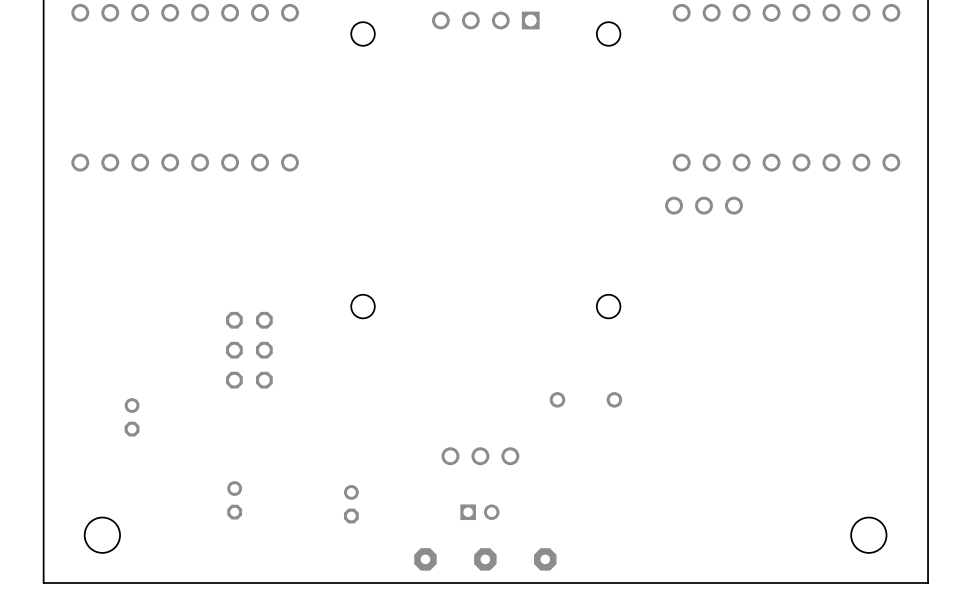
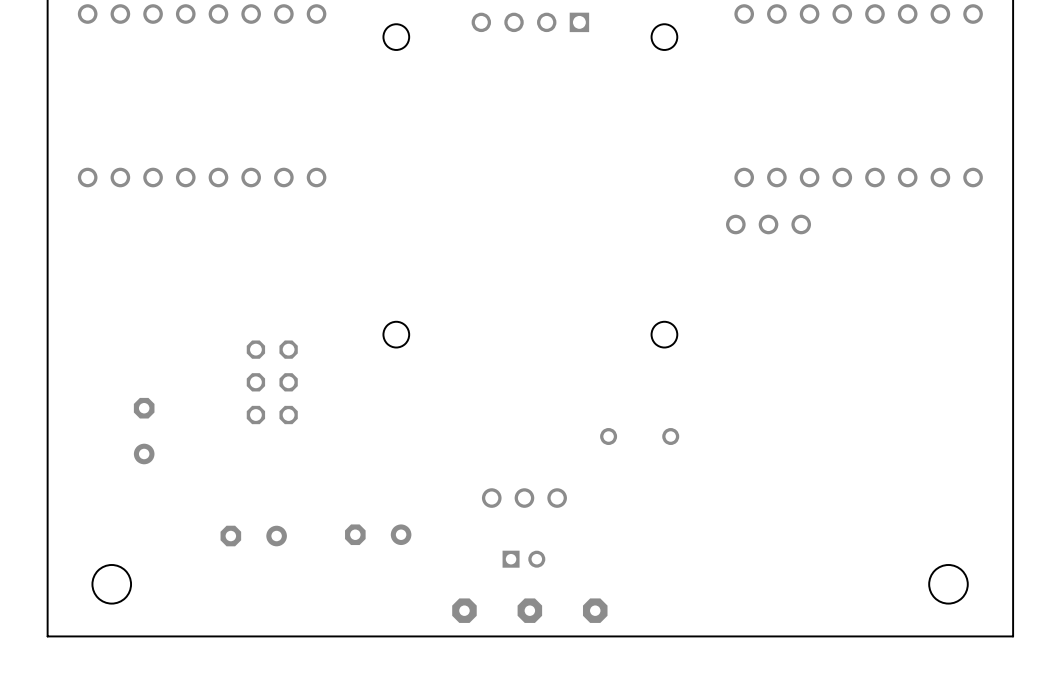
part: none -> (144, 431)
part: (132, 417) -> none
part footprint: [227, 481, 243, 520] -> [220, 525, 287, 547]
part: none -> (378, 534)
part: (351, 504) -> none

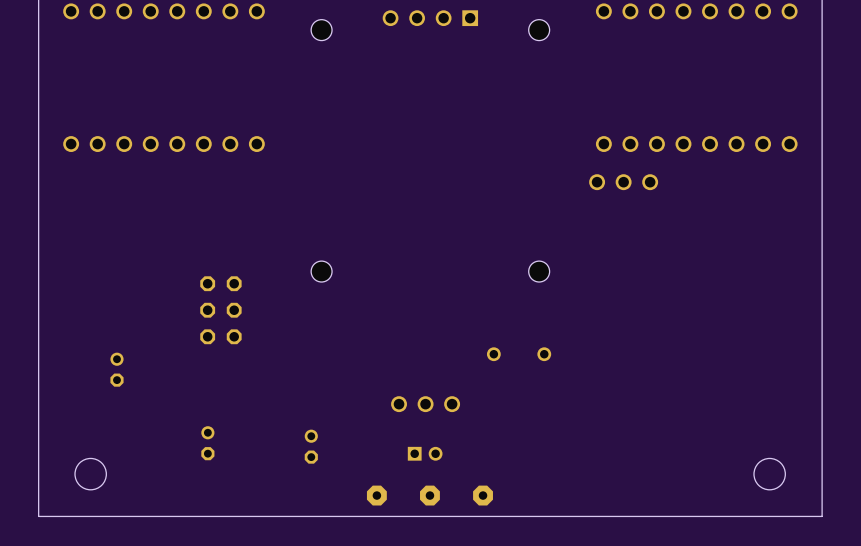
part: (144, 431) -> none
part: none -> (117, 369)
part footprint: [220, 525, 287, 547] -> [201, 426, 215, 461]
part: (378, 534) -> none
part: none -> (311, 446)

